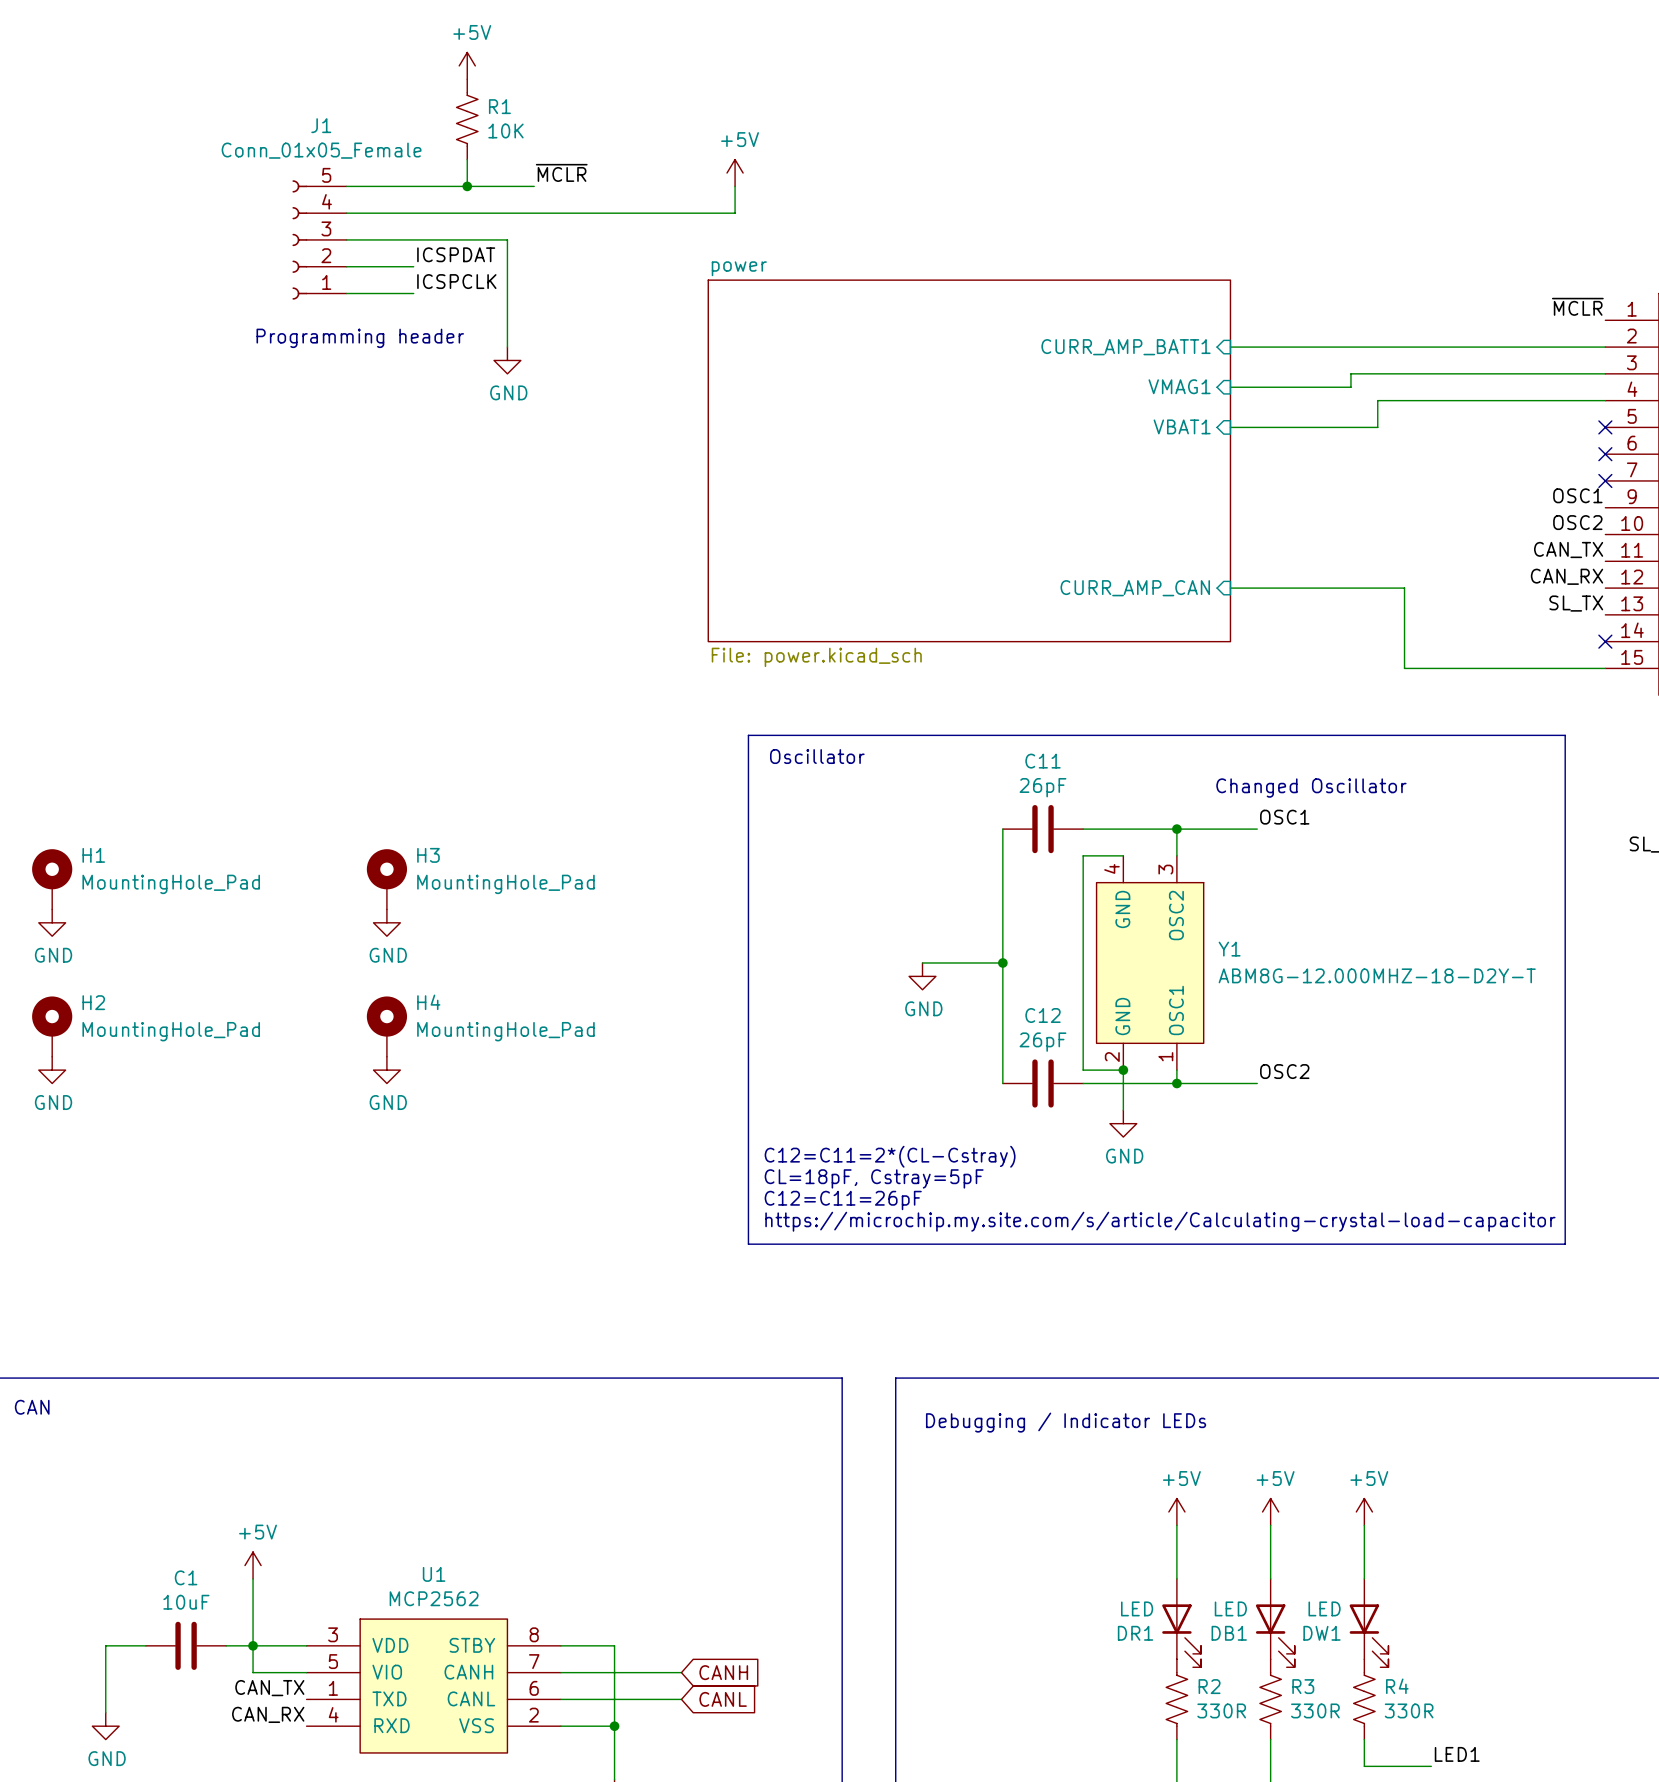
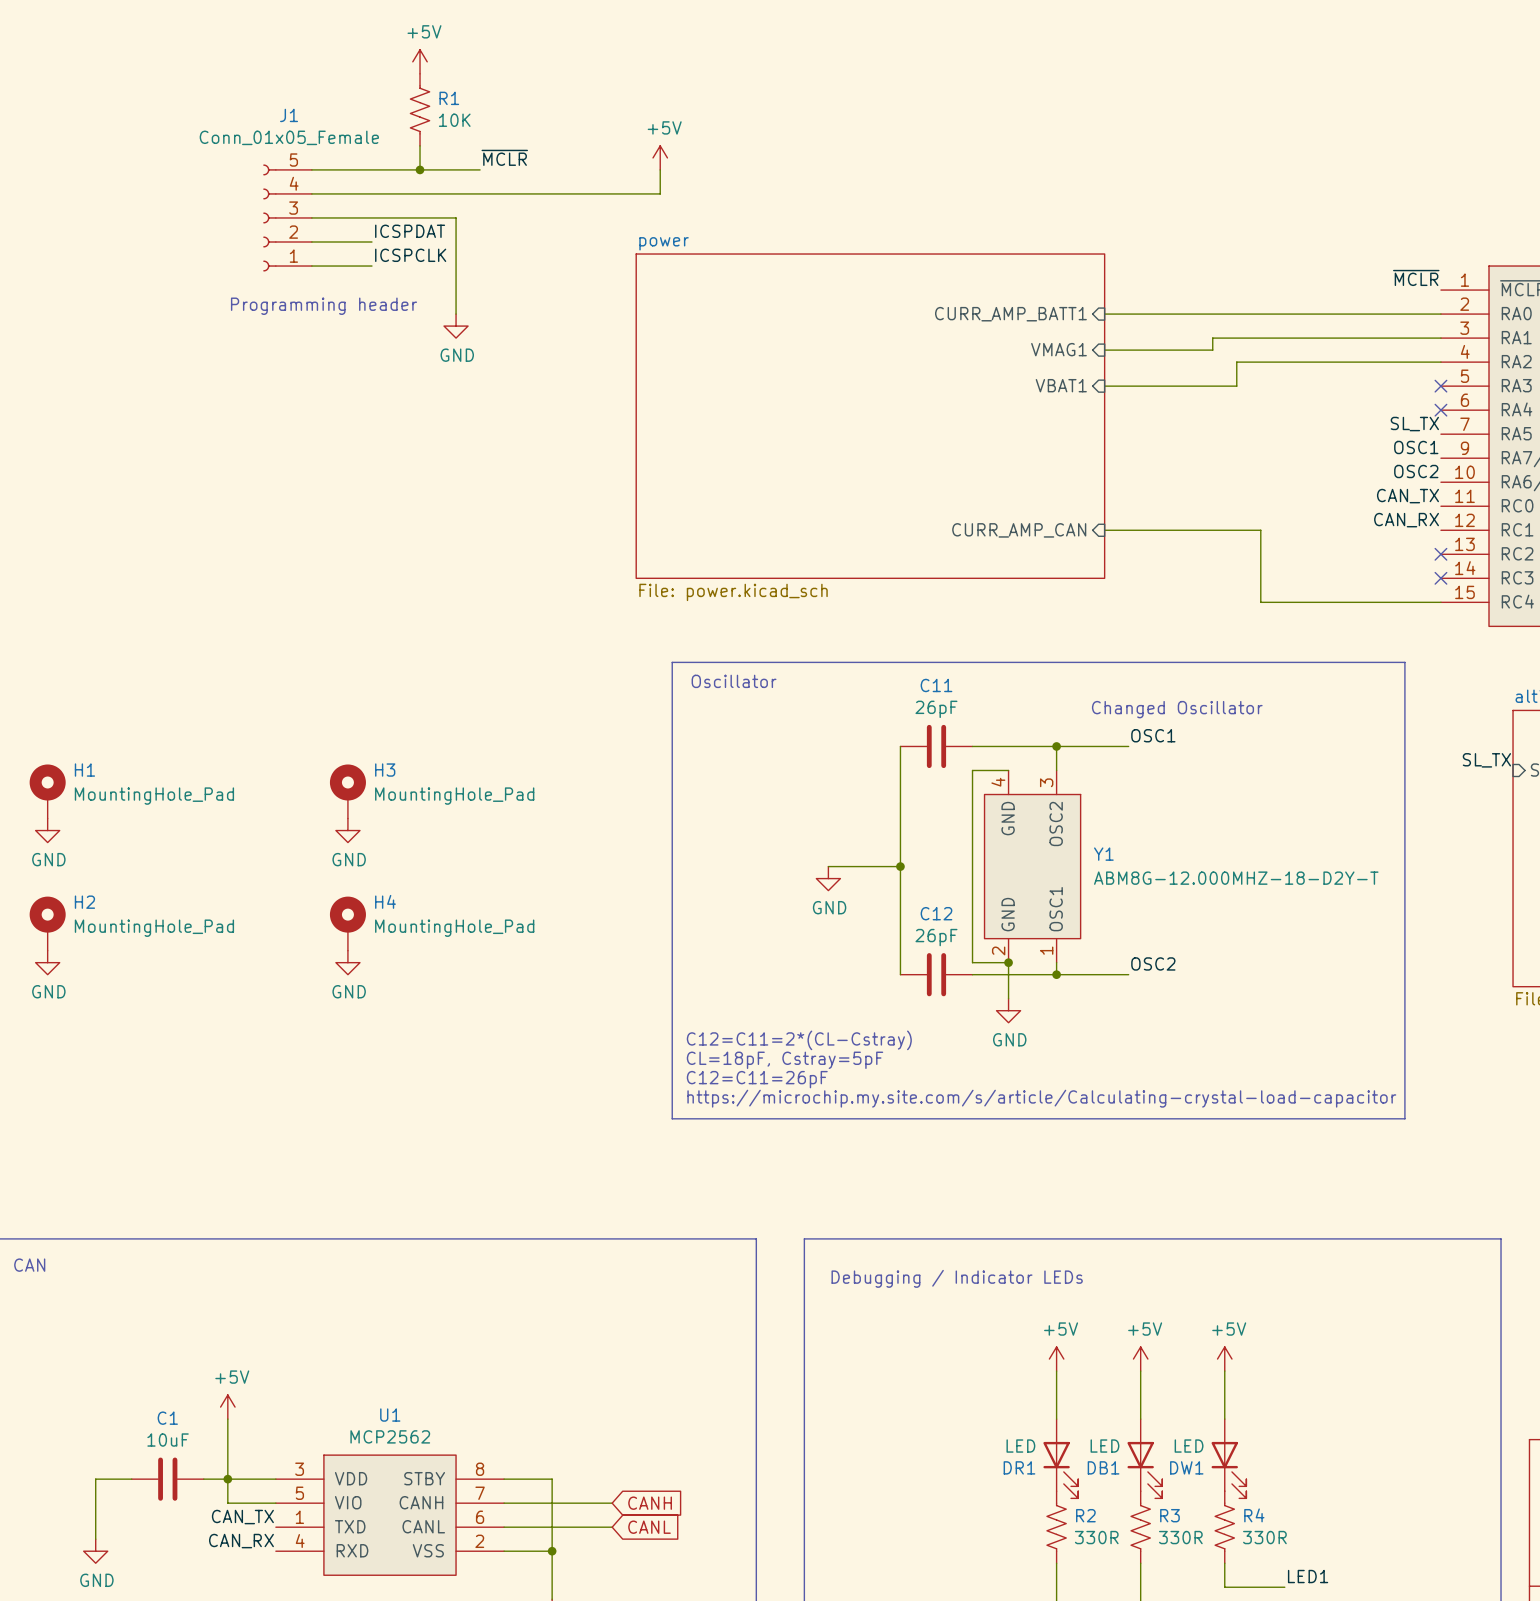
no-connect mark: (1605, 480) -> none
label position: SL_TX (1576, 603) -> SL_TX (1414, 424)
no-connect mark: none -> (1440, 554)

